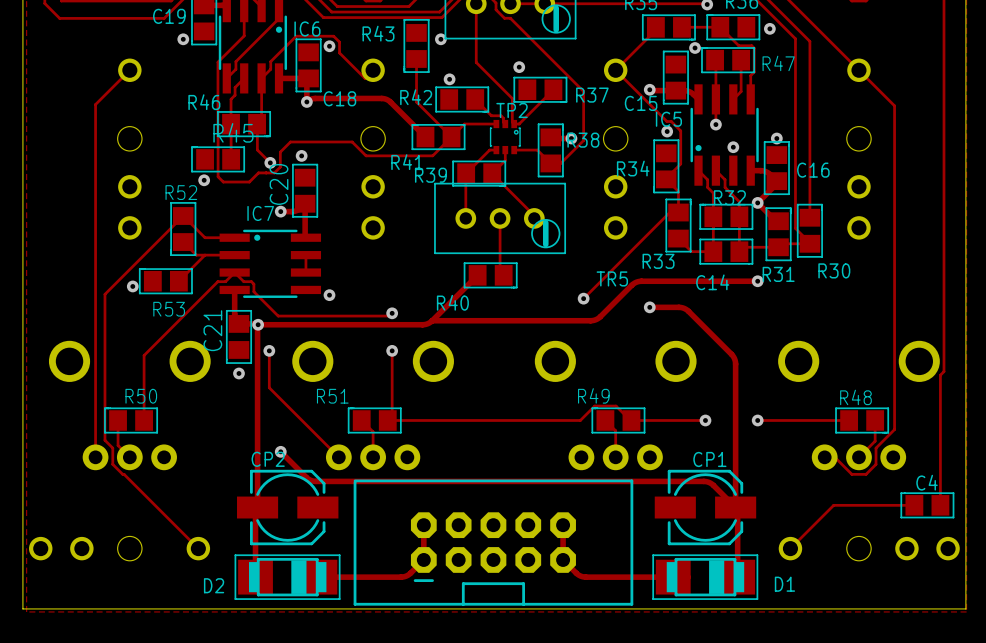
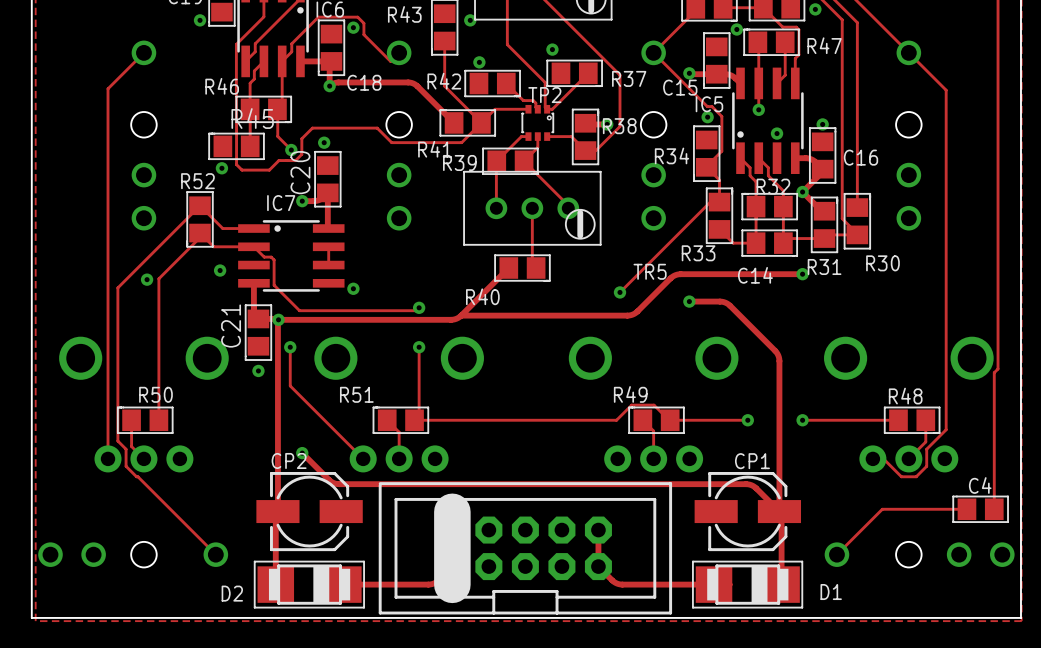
track: (205, 255) (178, 281) -> none
track: none -> (253, 246) (264, 257) (271, 257) (274, 259) (274, 277)
via: none -> (220, 270)
R53: (165, 281) -> none
track: (253, 284) (251, 281) (243, 281) (234, 272) (225, 281) (217, 281) (144, 355) -> (202, 235) (158, 278) (158, 352)
part footprint: [353, 479, 634, 606] -> [378, 482, 673, 615]

